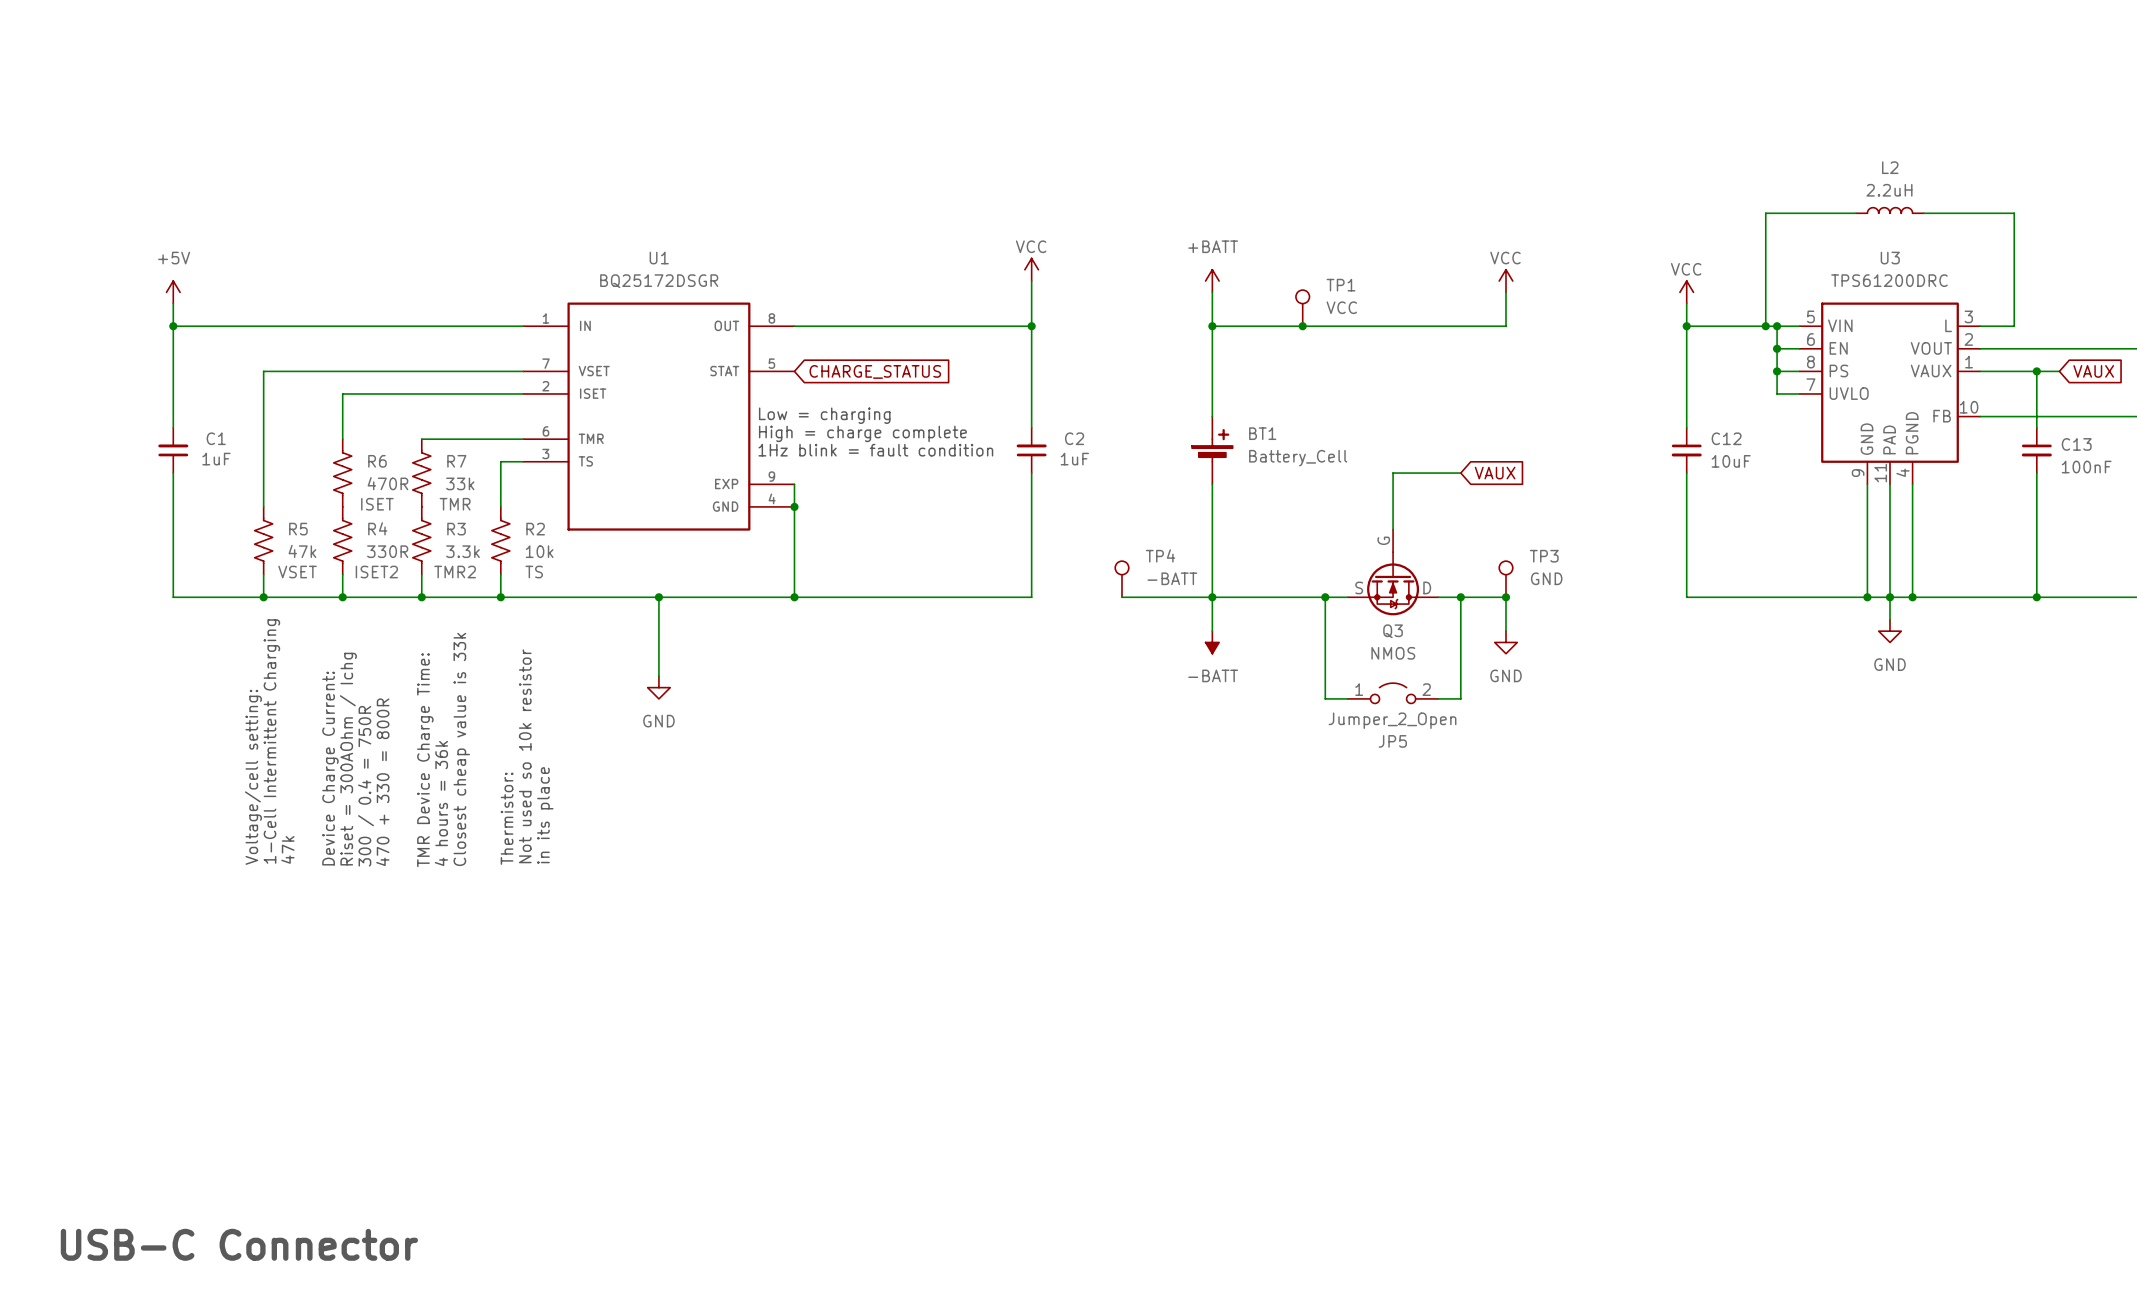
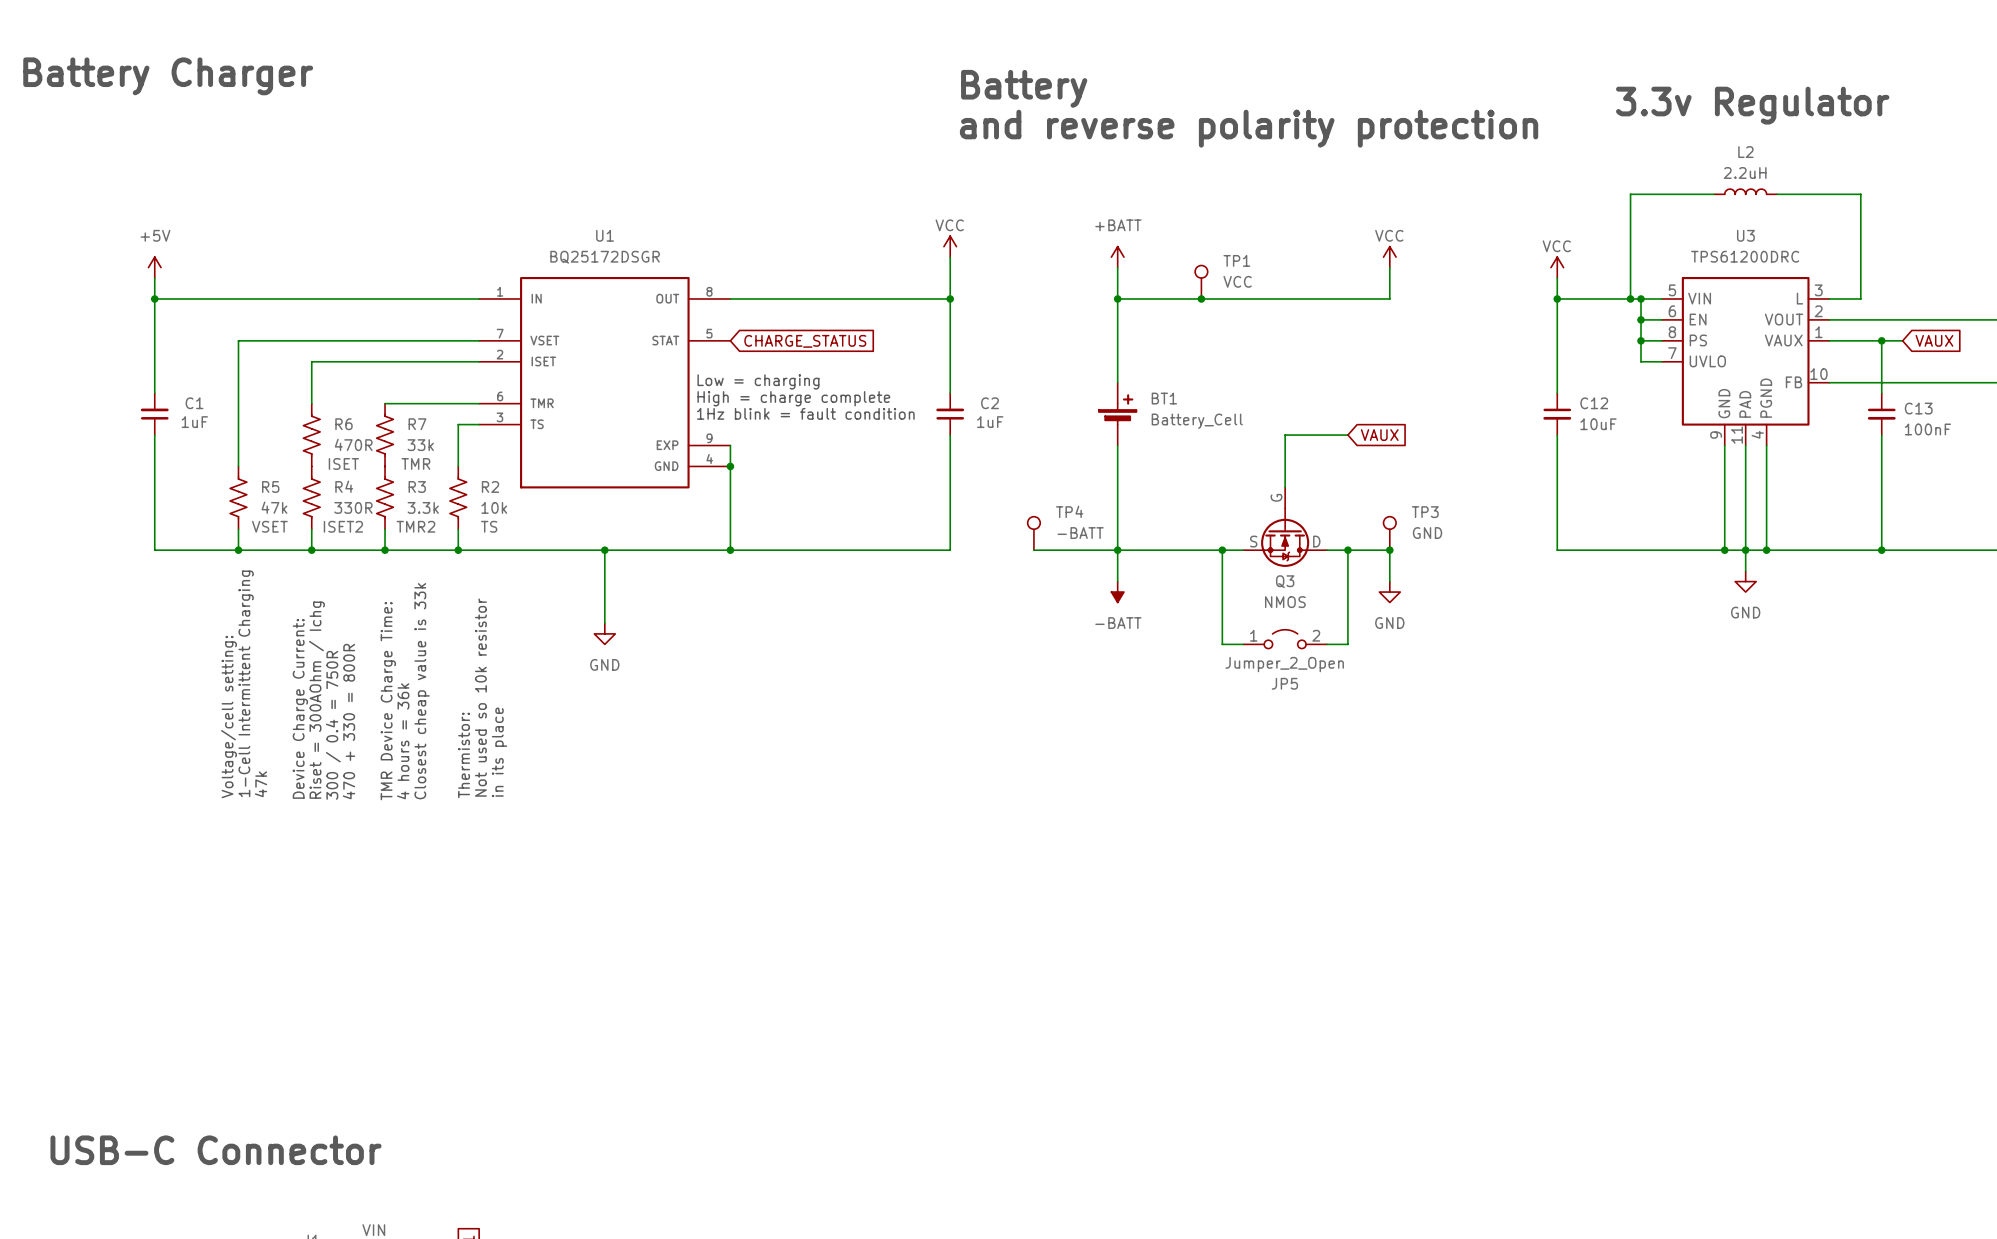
text: none -> Battery Charger (168, 76)
text: none -> Battery (1024, 88)
text: none -> 3.3v Regulator (1752, 105)
text: none -> and reverse polarity protection (1249, 128)

